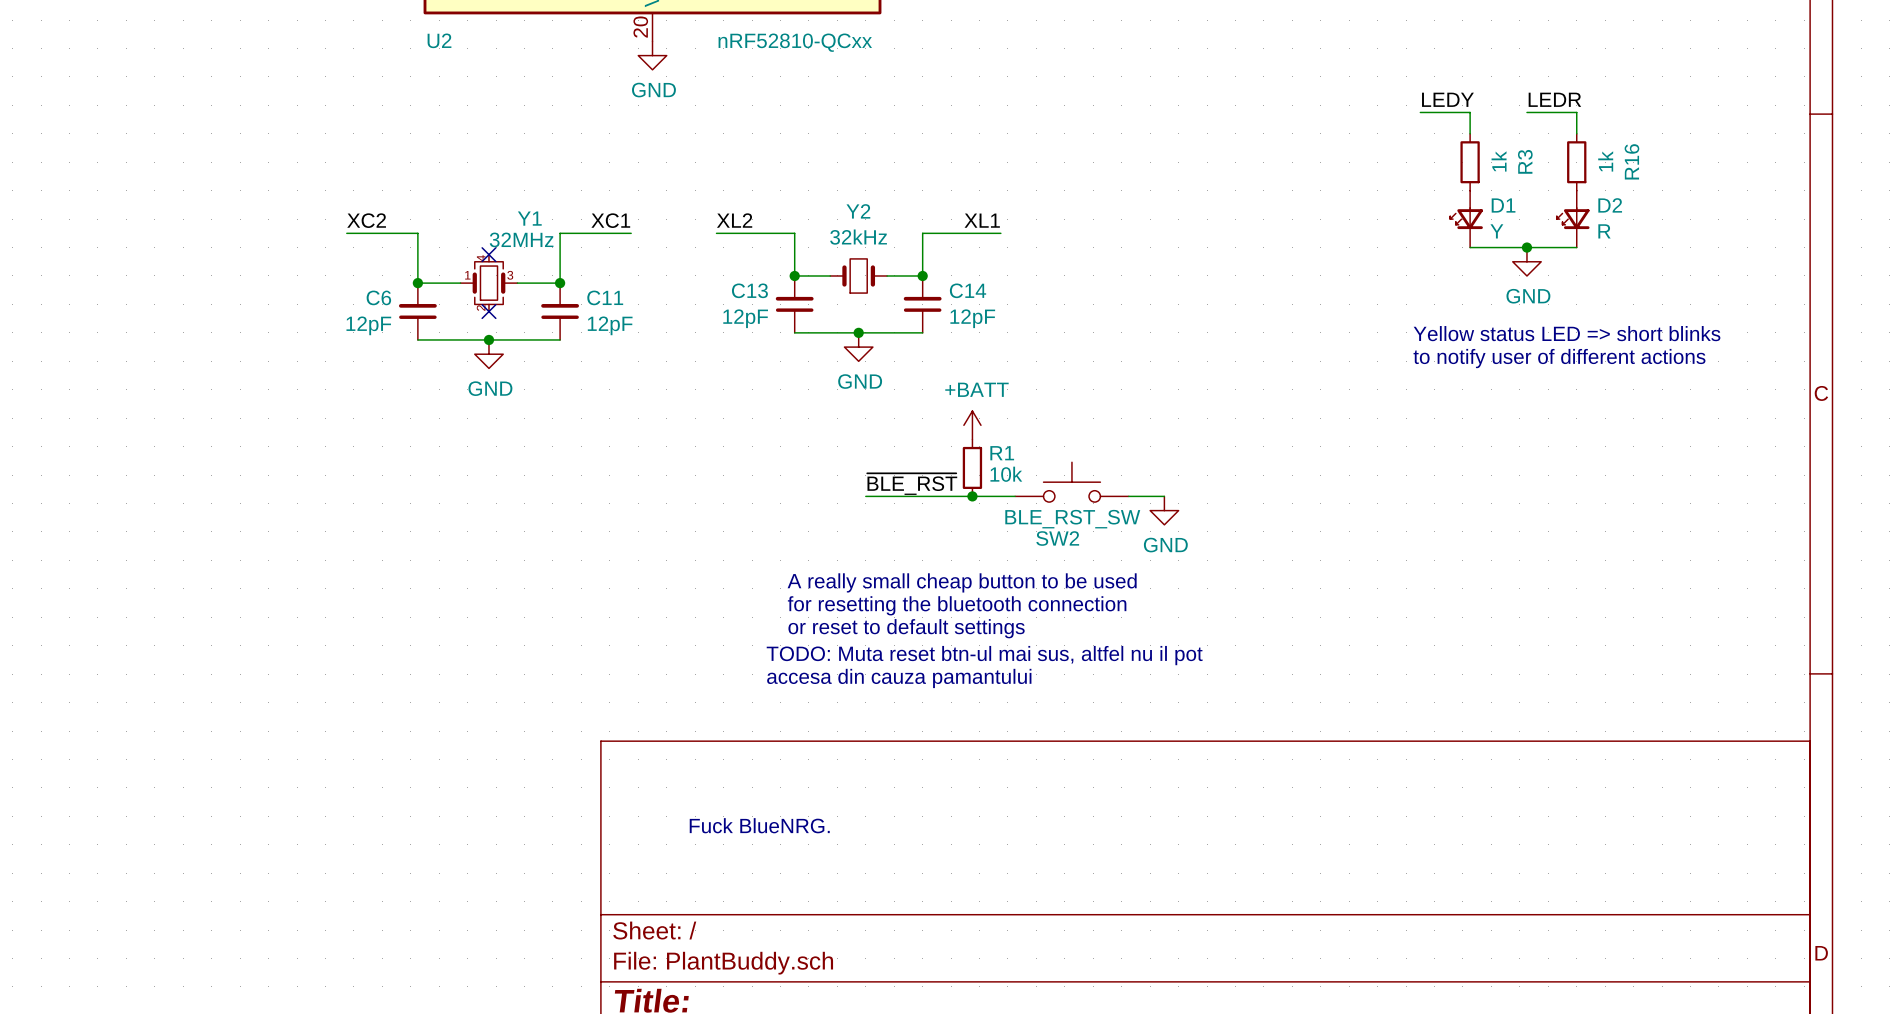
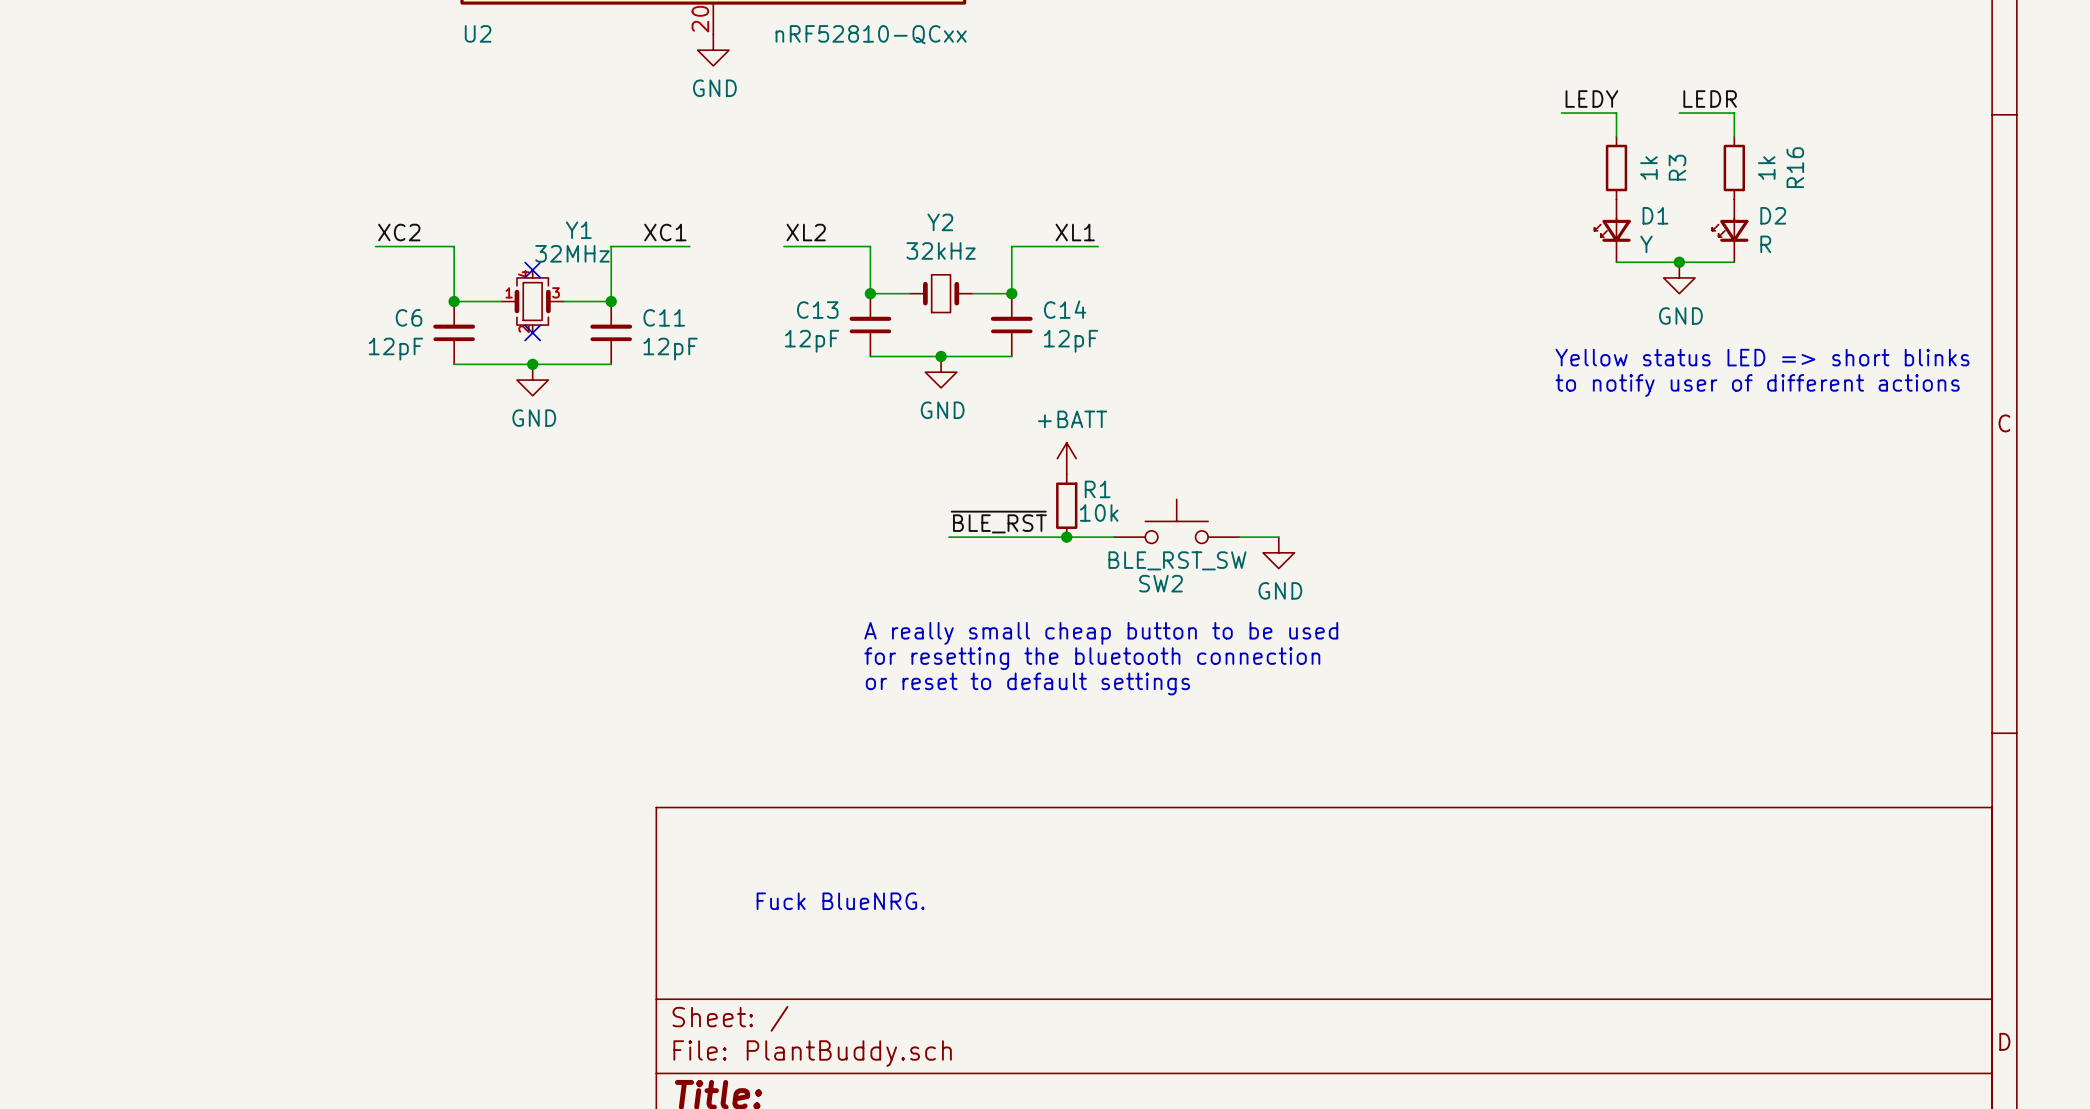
text: TODO: Muta reset btn-ul mai sus, altfel nu il pot (984, 655) -> none
text: accesa din cauza pamantului (899, 678) -> none

